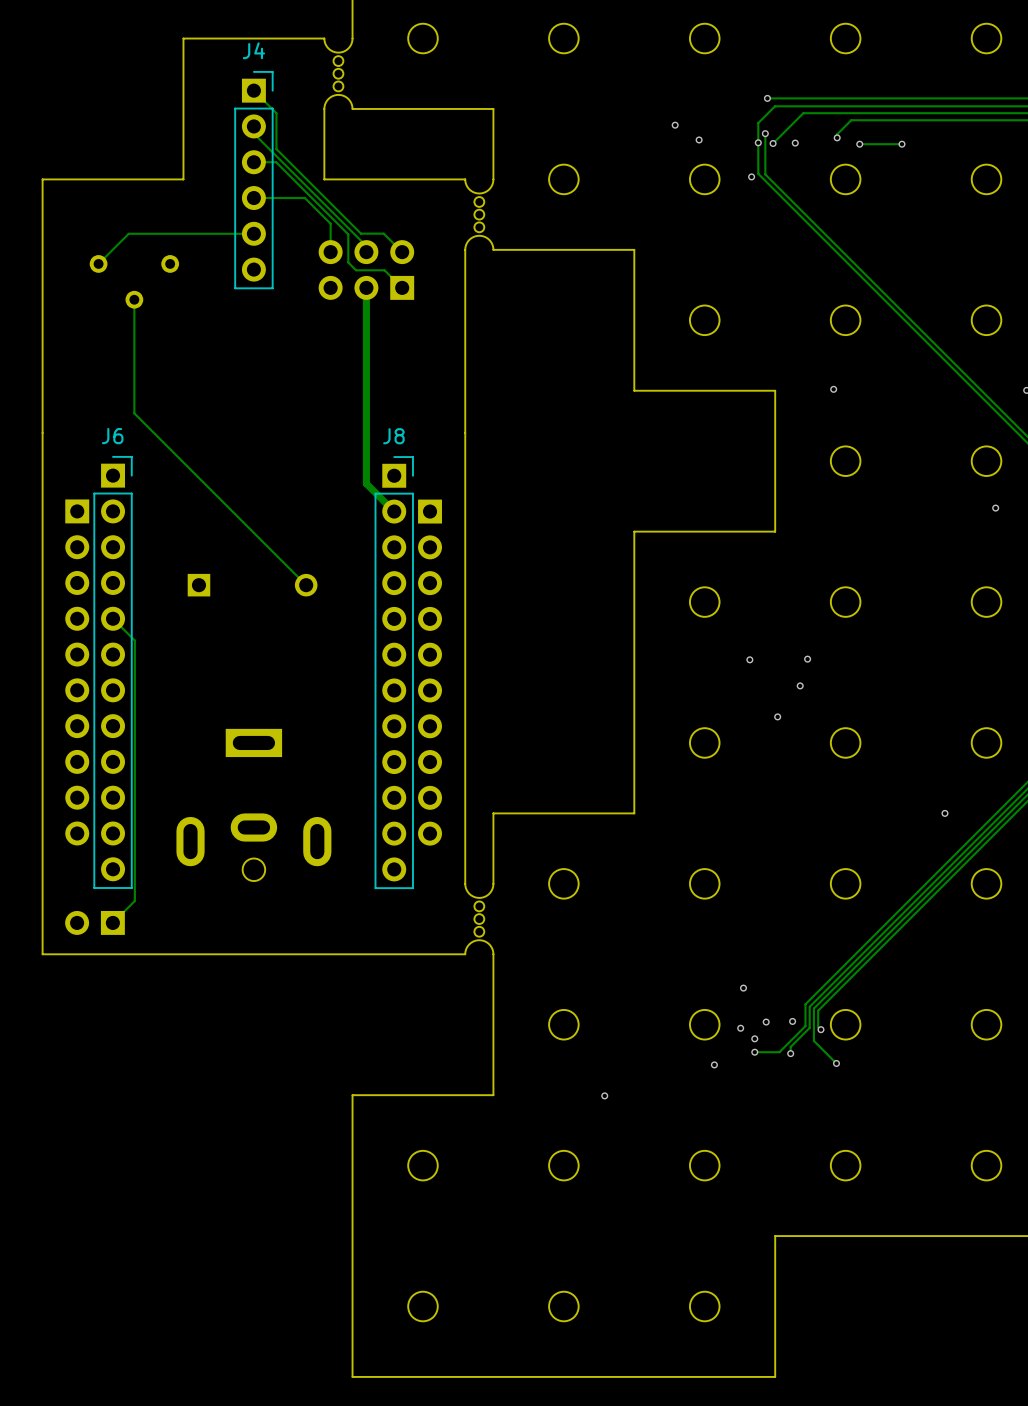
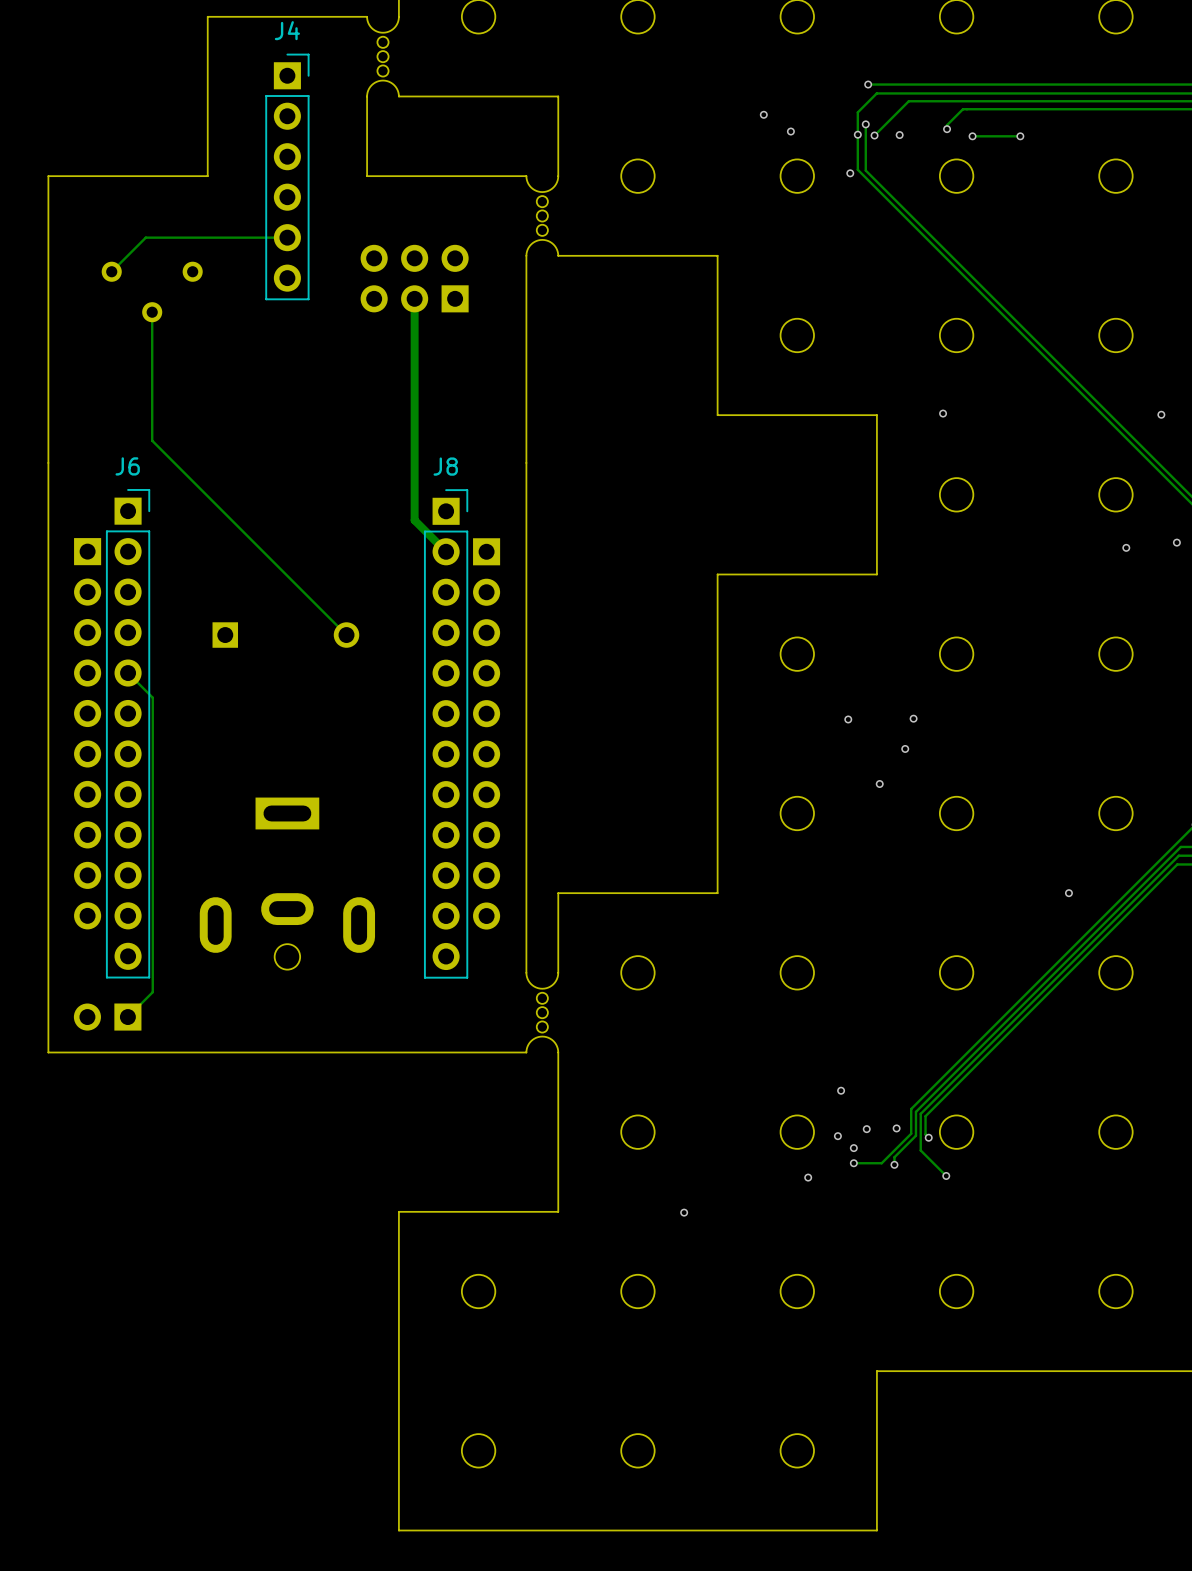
track: (253, 90) (276, 113) (276, 149) (360, 233) (383, 233) (402, 252) -> none
track: (253, 126) (253, 133) (366, 246) (366, 252) -> none
track: (253, 162) (276, 162) (348, 234) (348, 262) (356, 270) (384, 270) (402, 287) -> none
track: (253, 198) (304, 198) (330, 223) (330, 252) -> none

